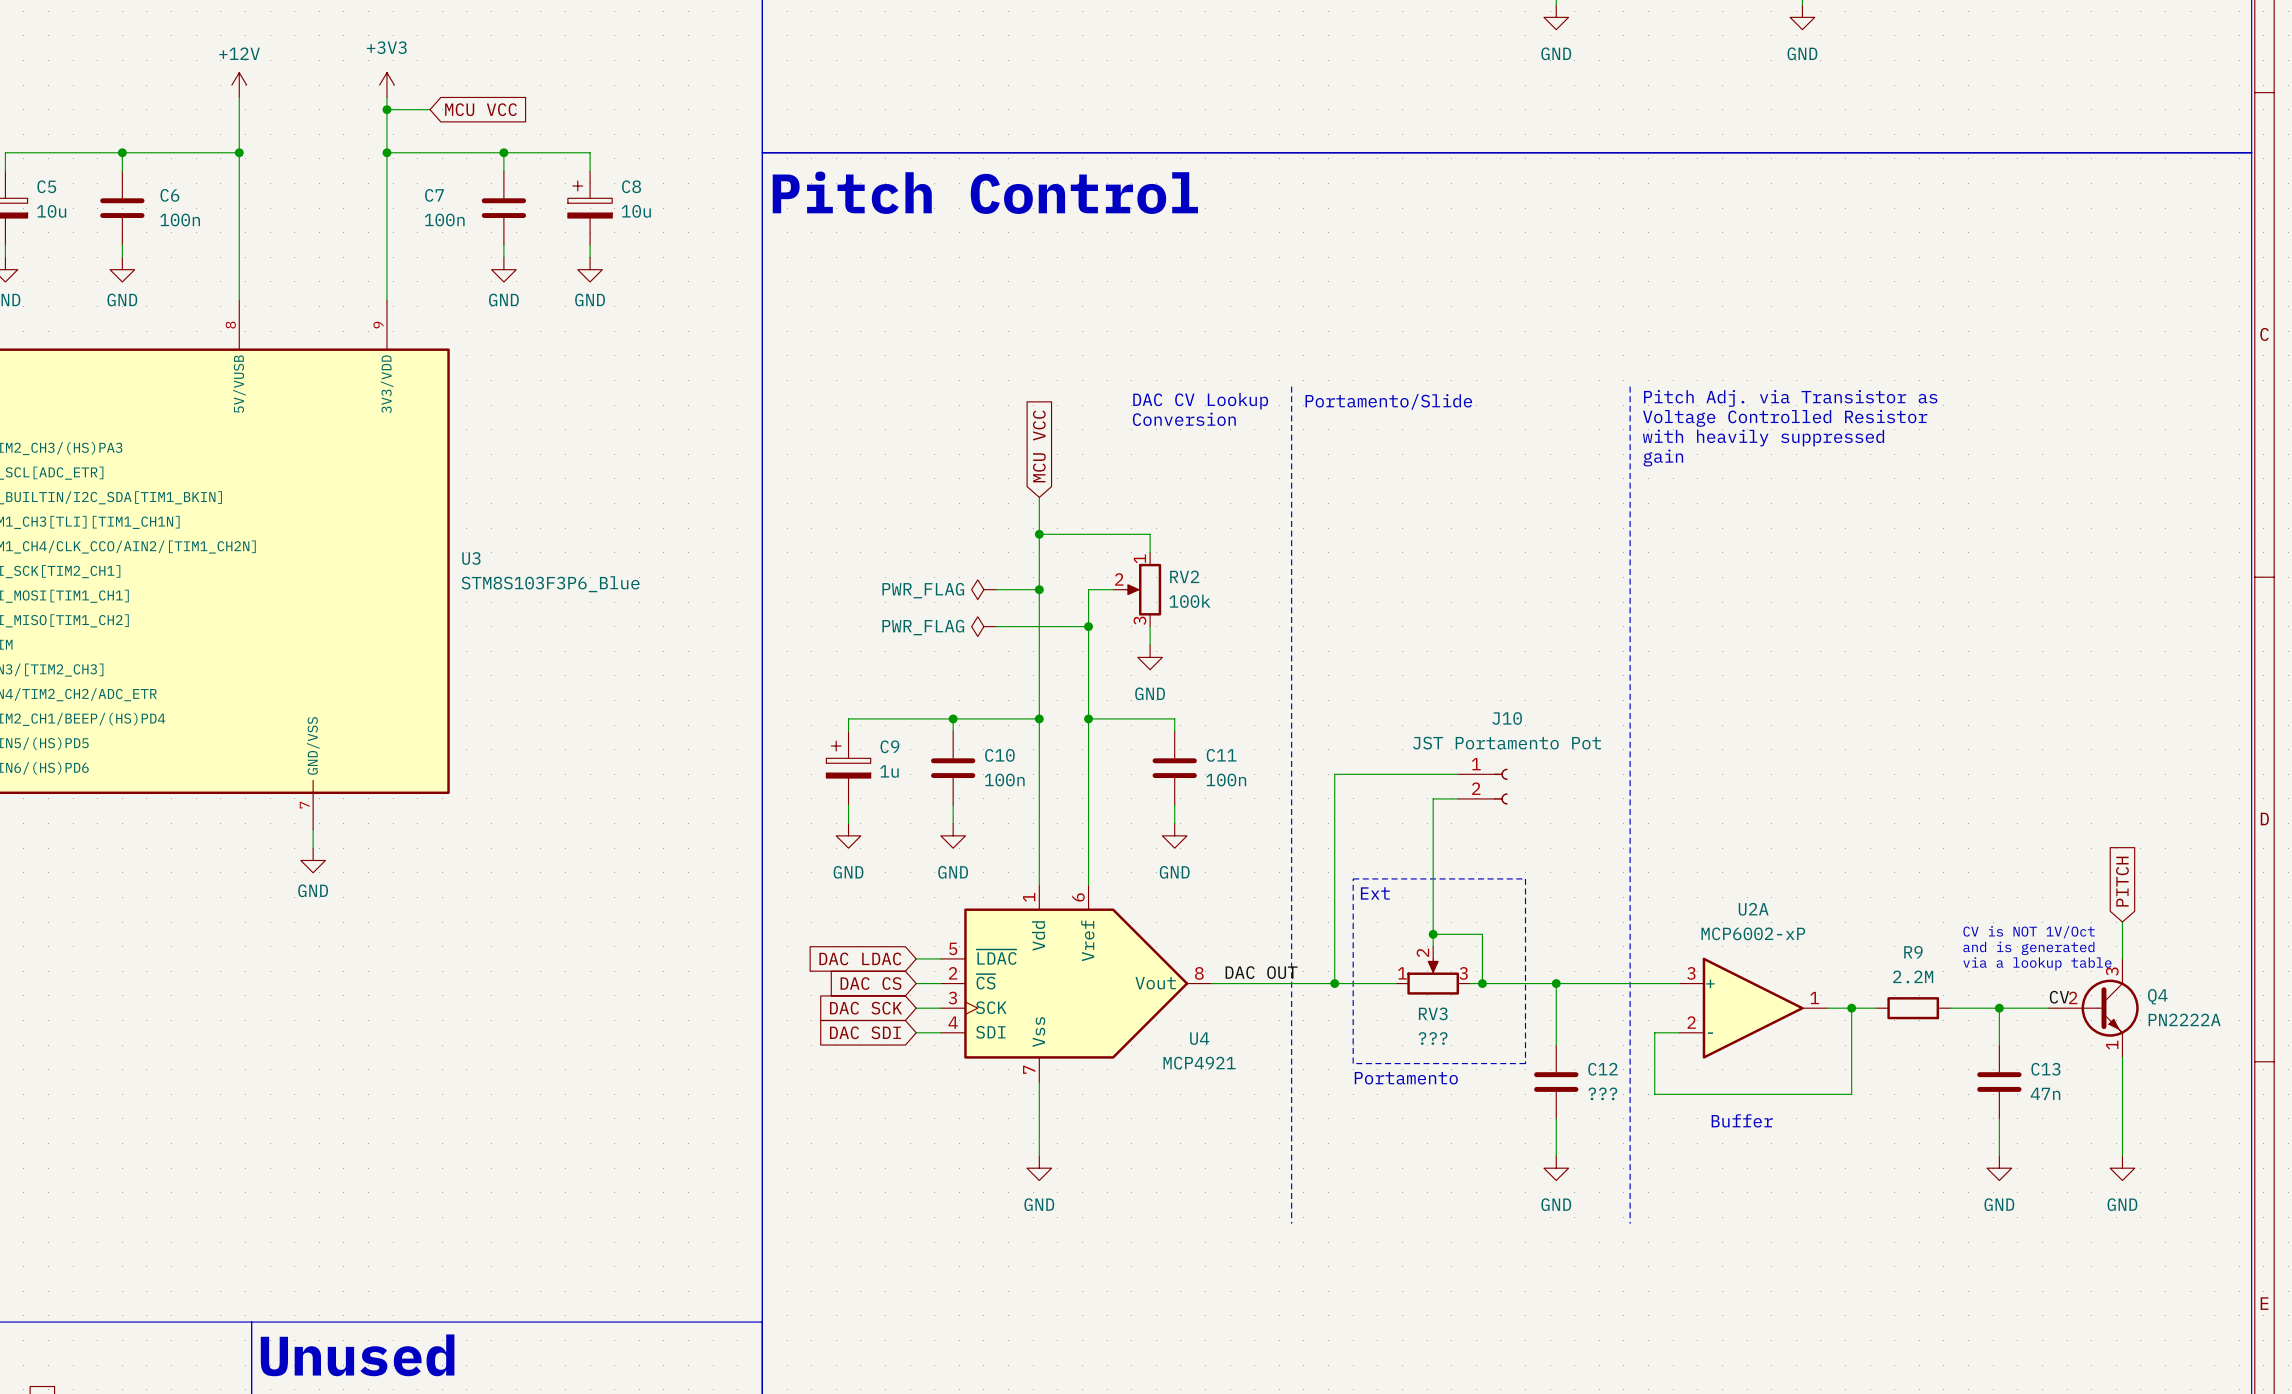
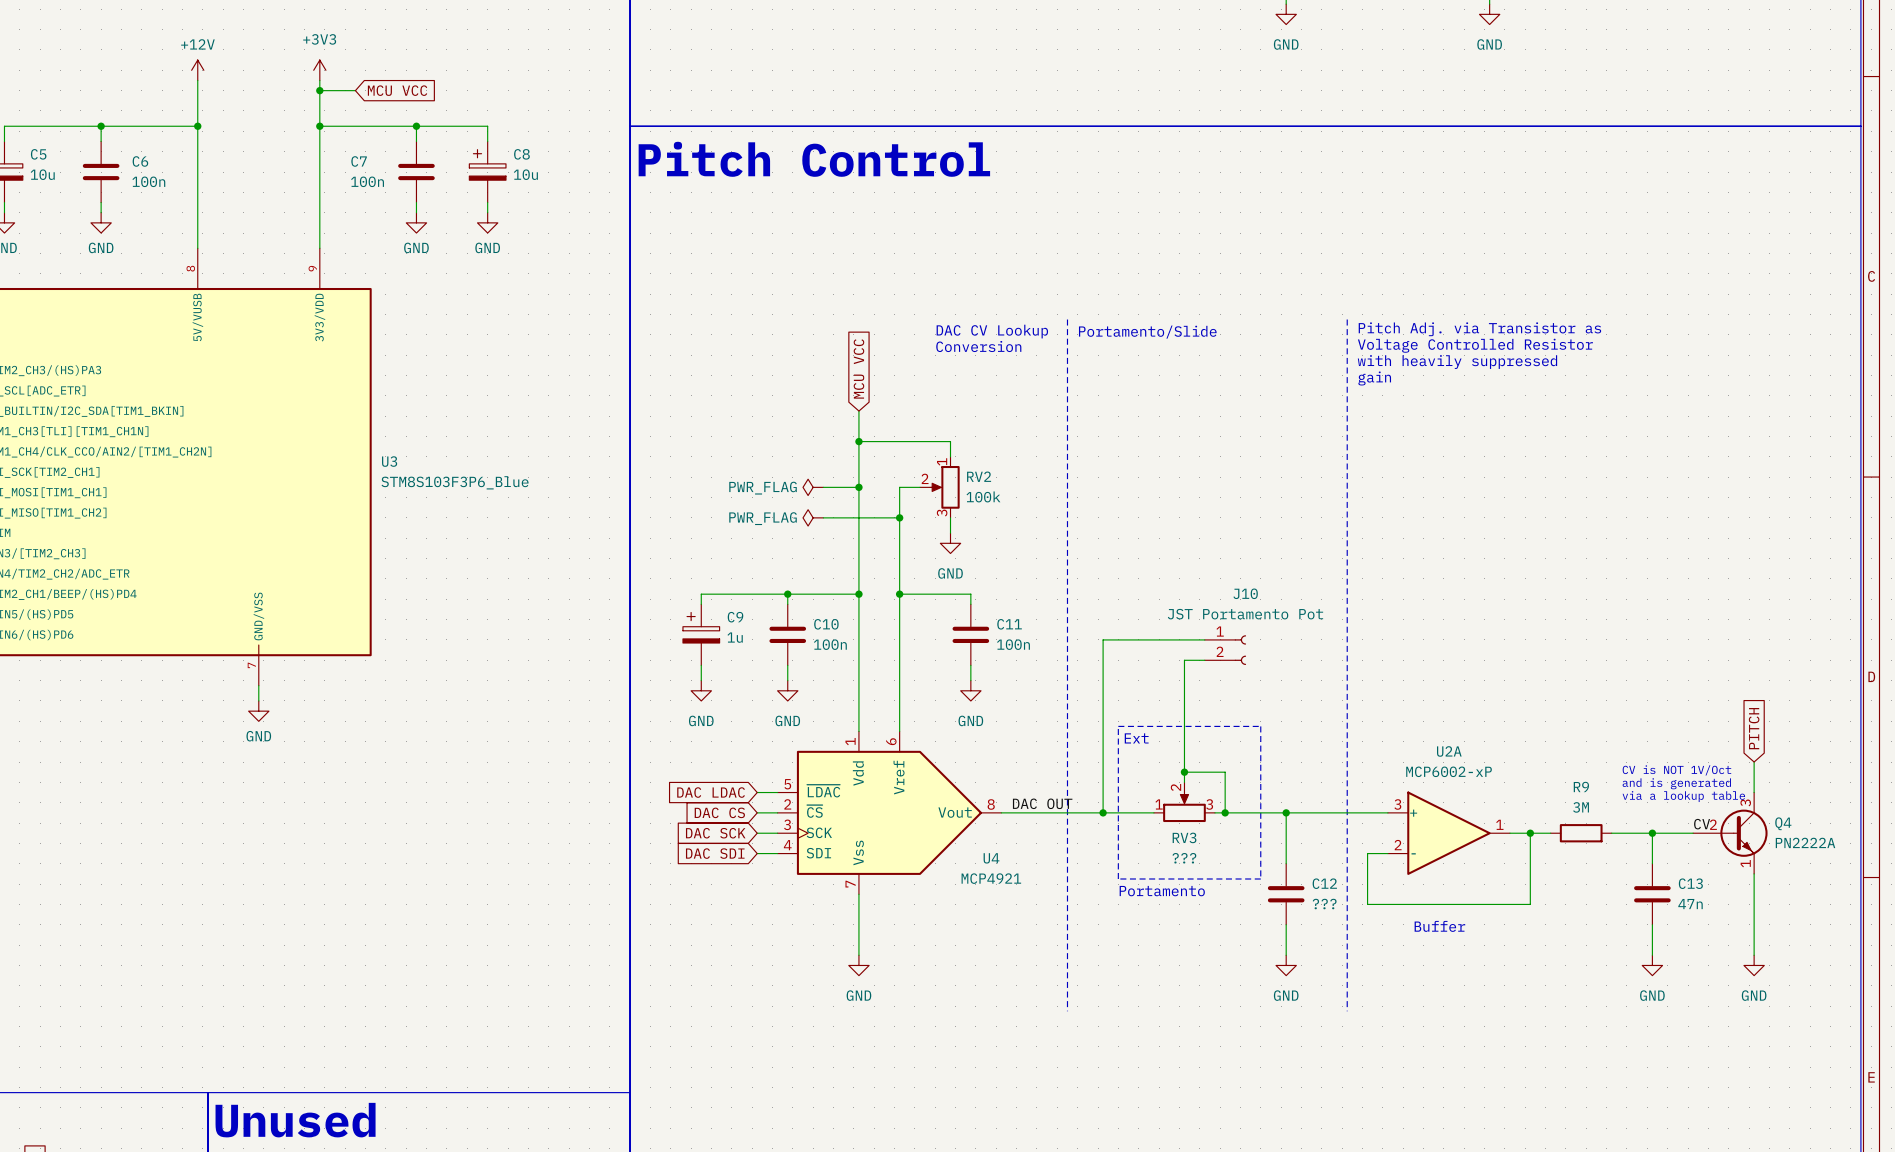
R9 value: 2.2M (1913, 976) -> 3M (1581, 807)

